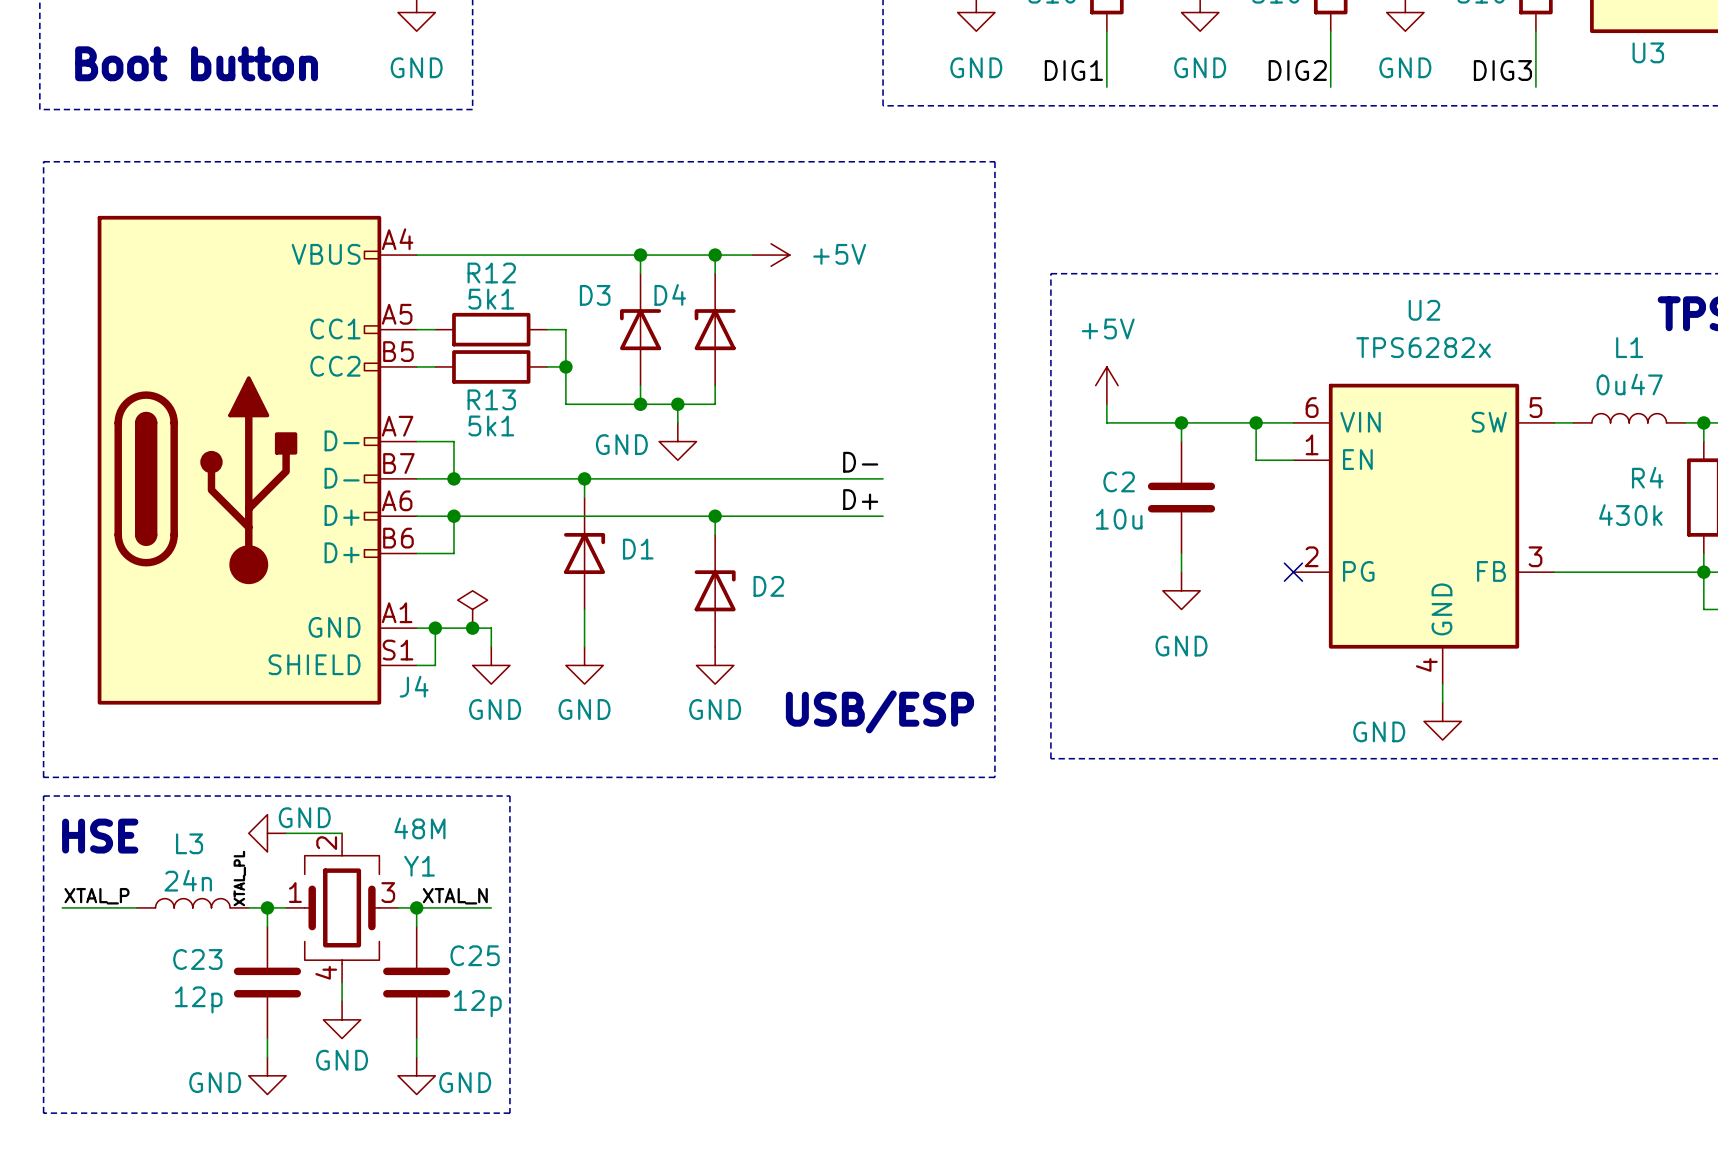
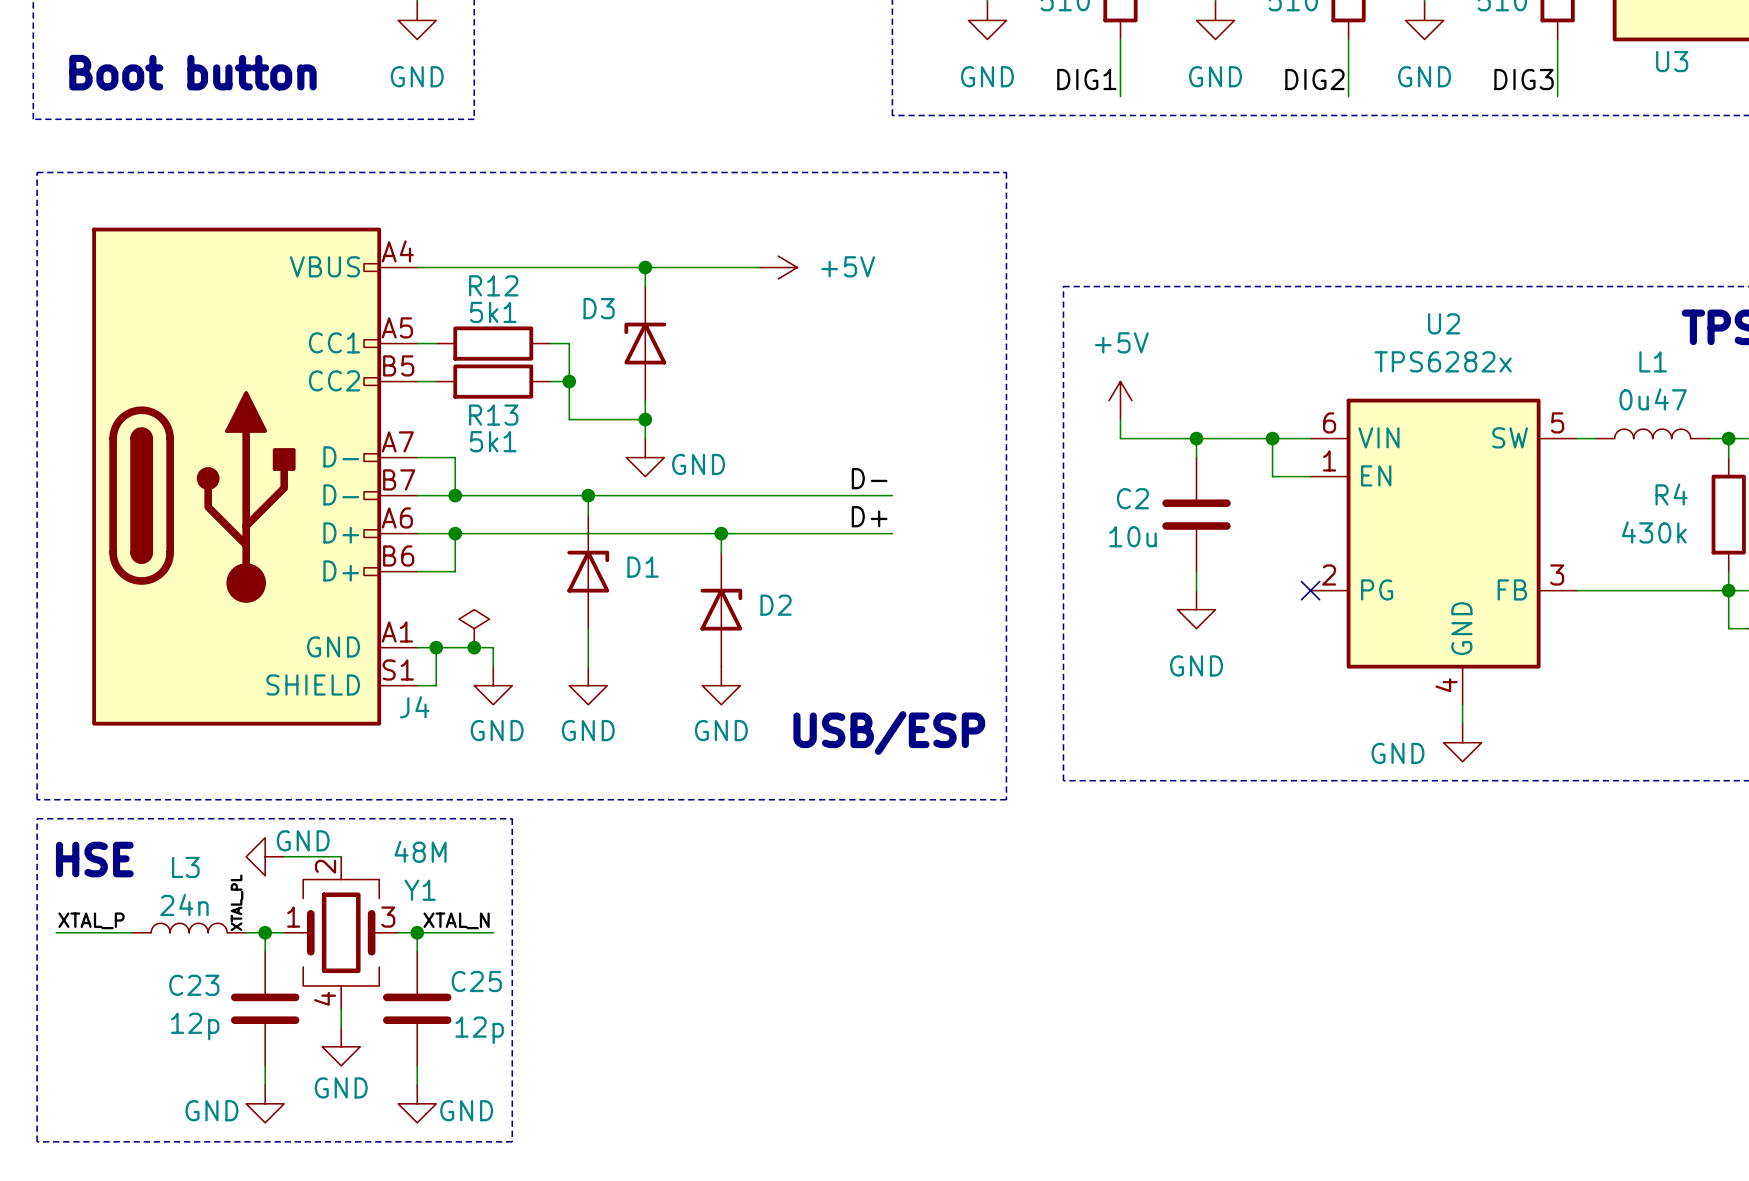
wire: (715, 255) (715, 273) -> none
junction: (715, 255) -> none
D4: (715, 329) -> none
wire: (715, 385) (715, 404) (640, 404) -> (645, 438) (645, 419)
wire: (677, 404) (677, 422) -> none
junction: (677, 404) -> none
power symbol position: GND (677, 441) -> GND (645, 457)
power symbol text position: GND (621, 444) -> GND (698, 464)

